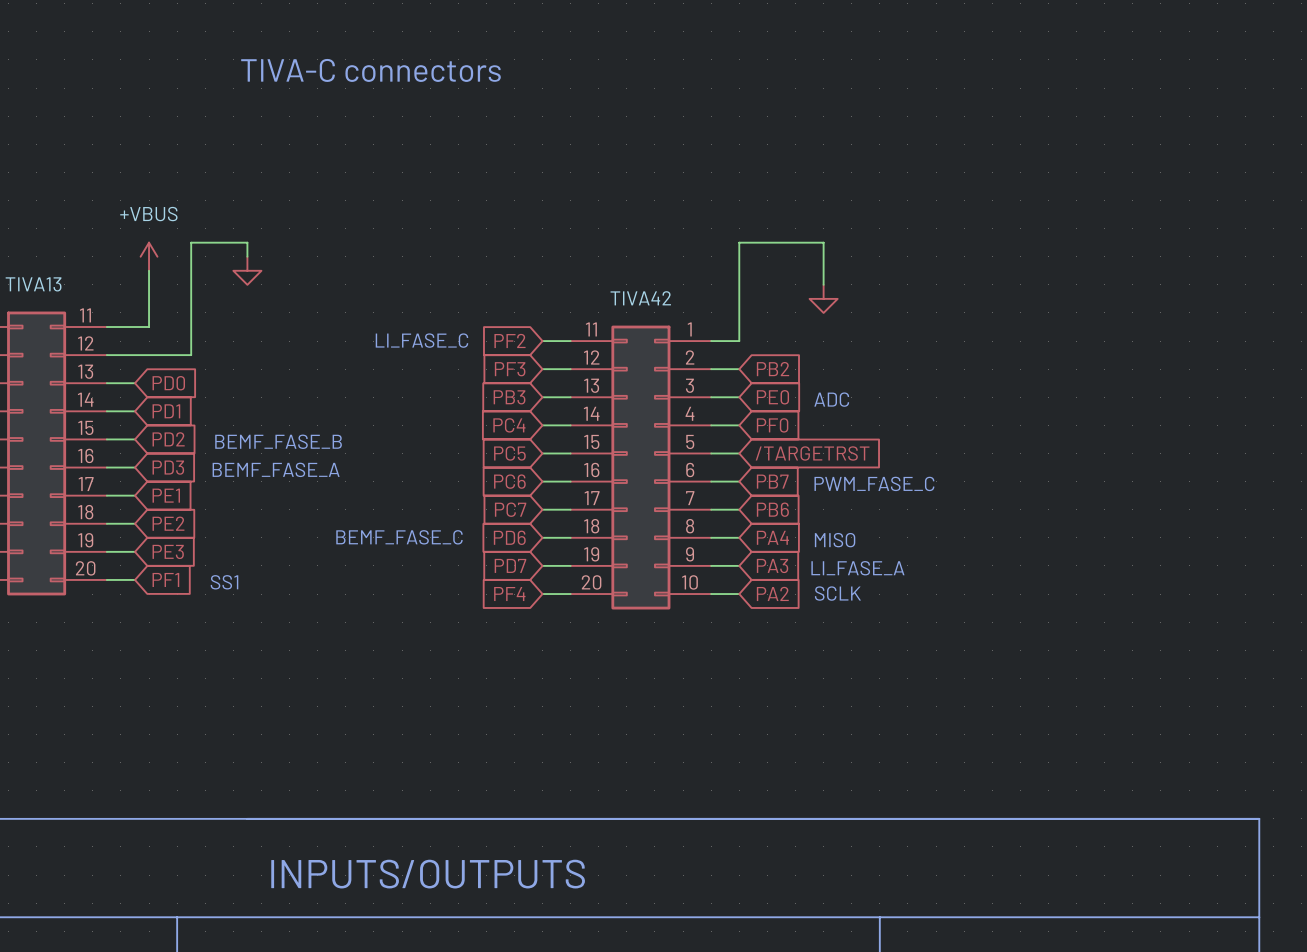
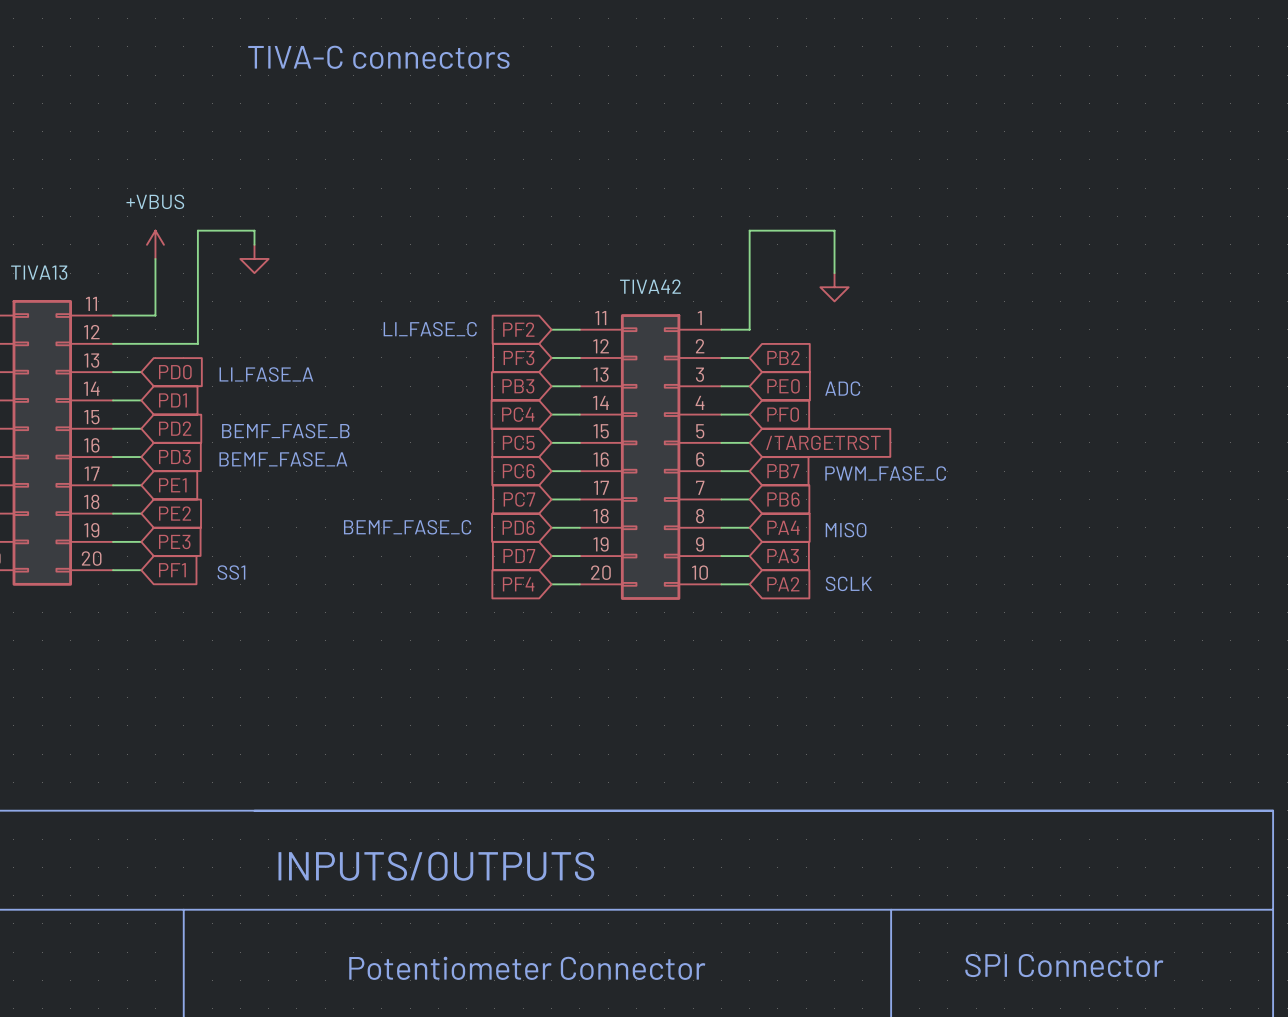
text: none -> LI_FASE_A (266, 374)
text: LI_FASE_A (857, 568) -> none

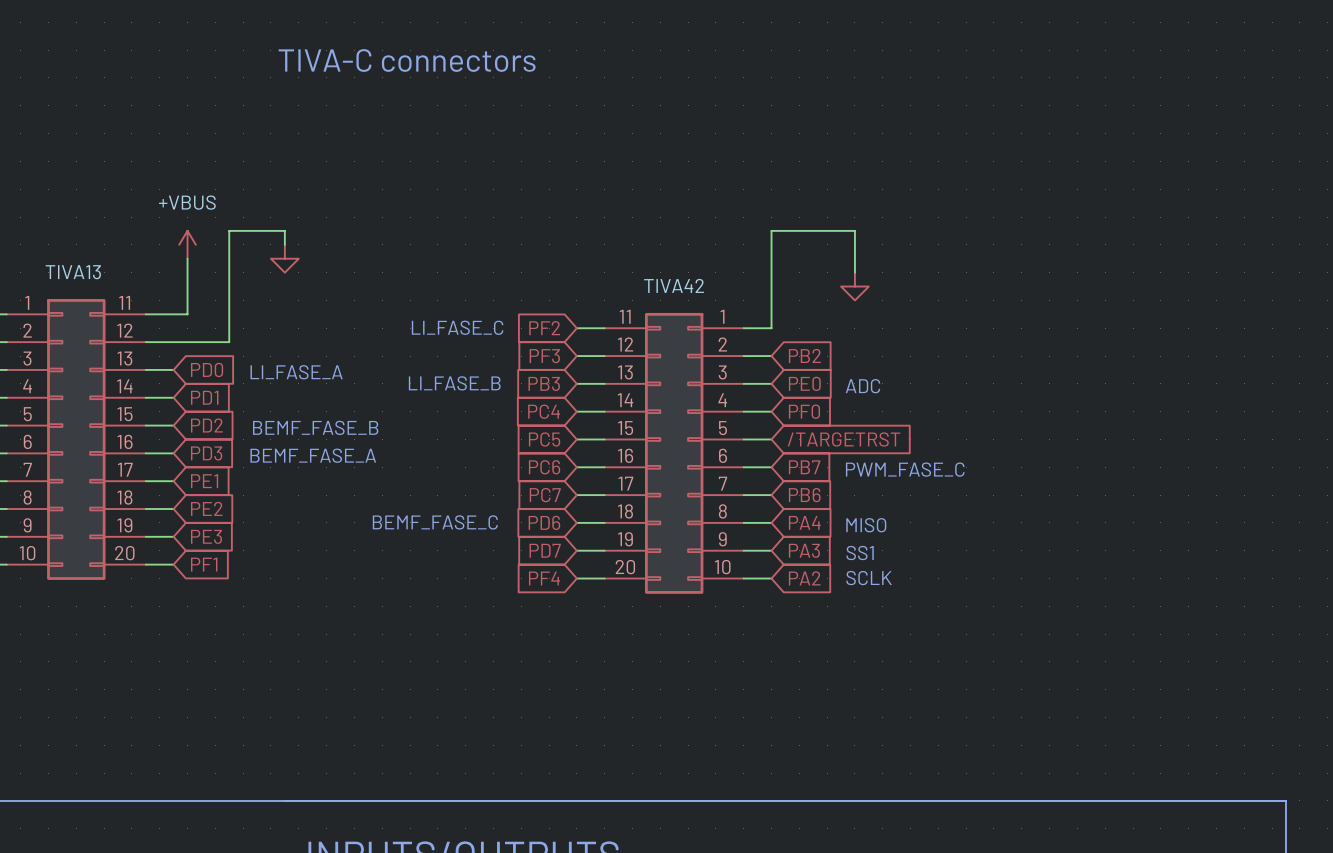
text: none -> LI_FASE_B (454, 383)
text: none -> SS1 (860, 553)
text: SS1 (231, 572) -> none

